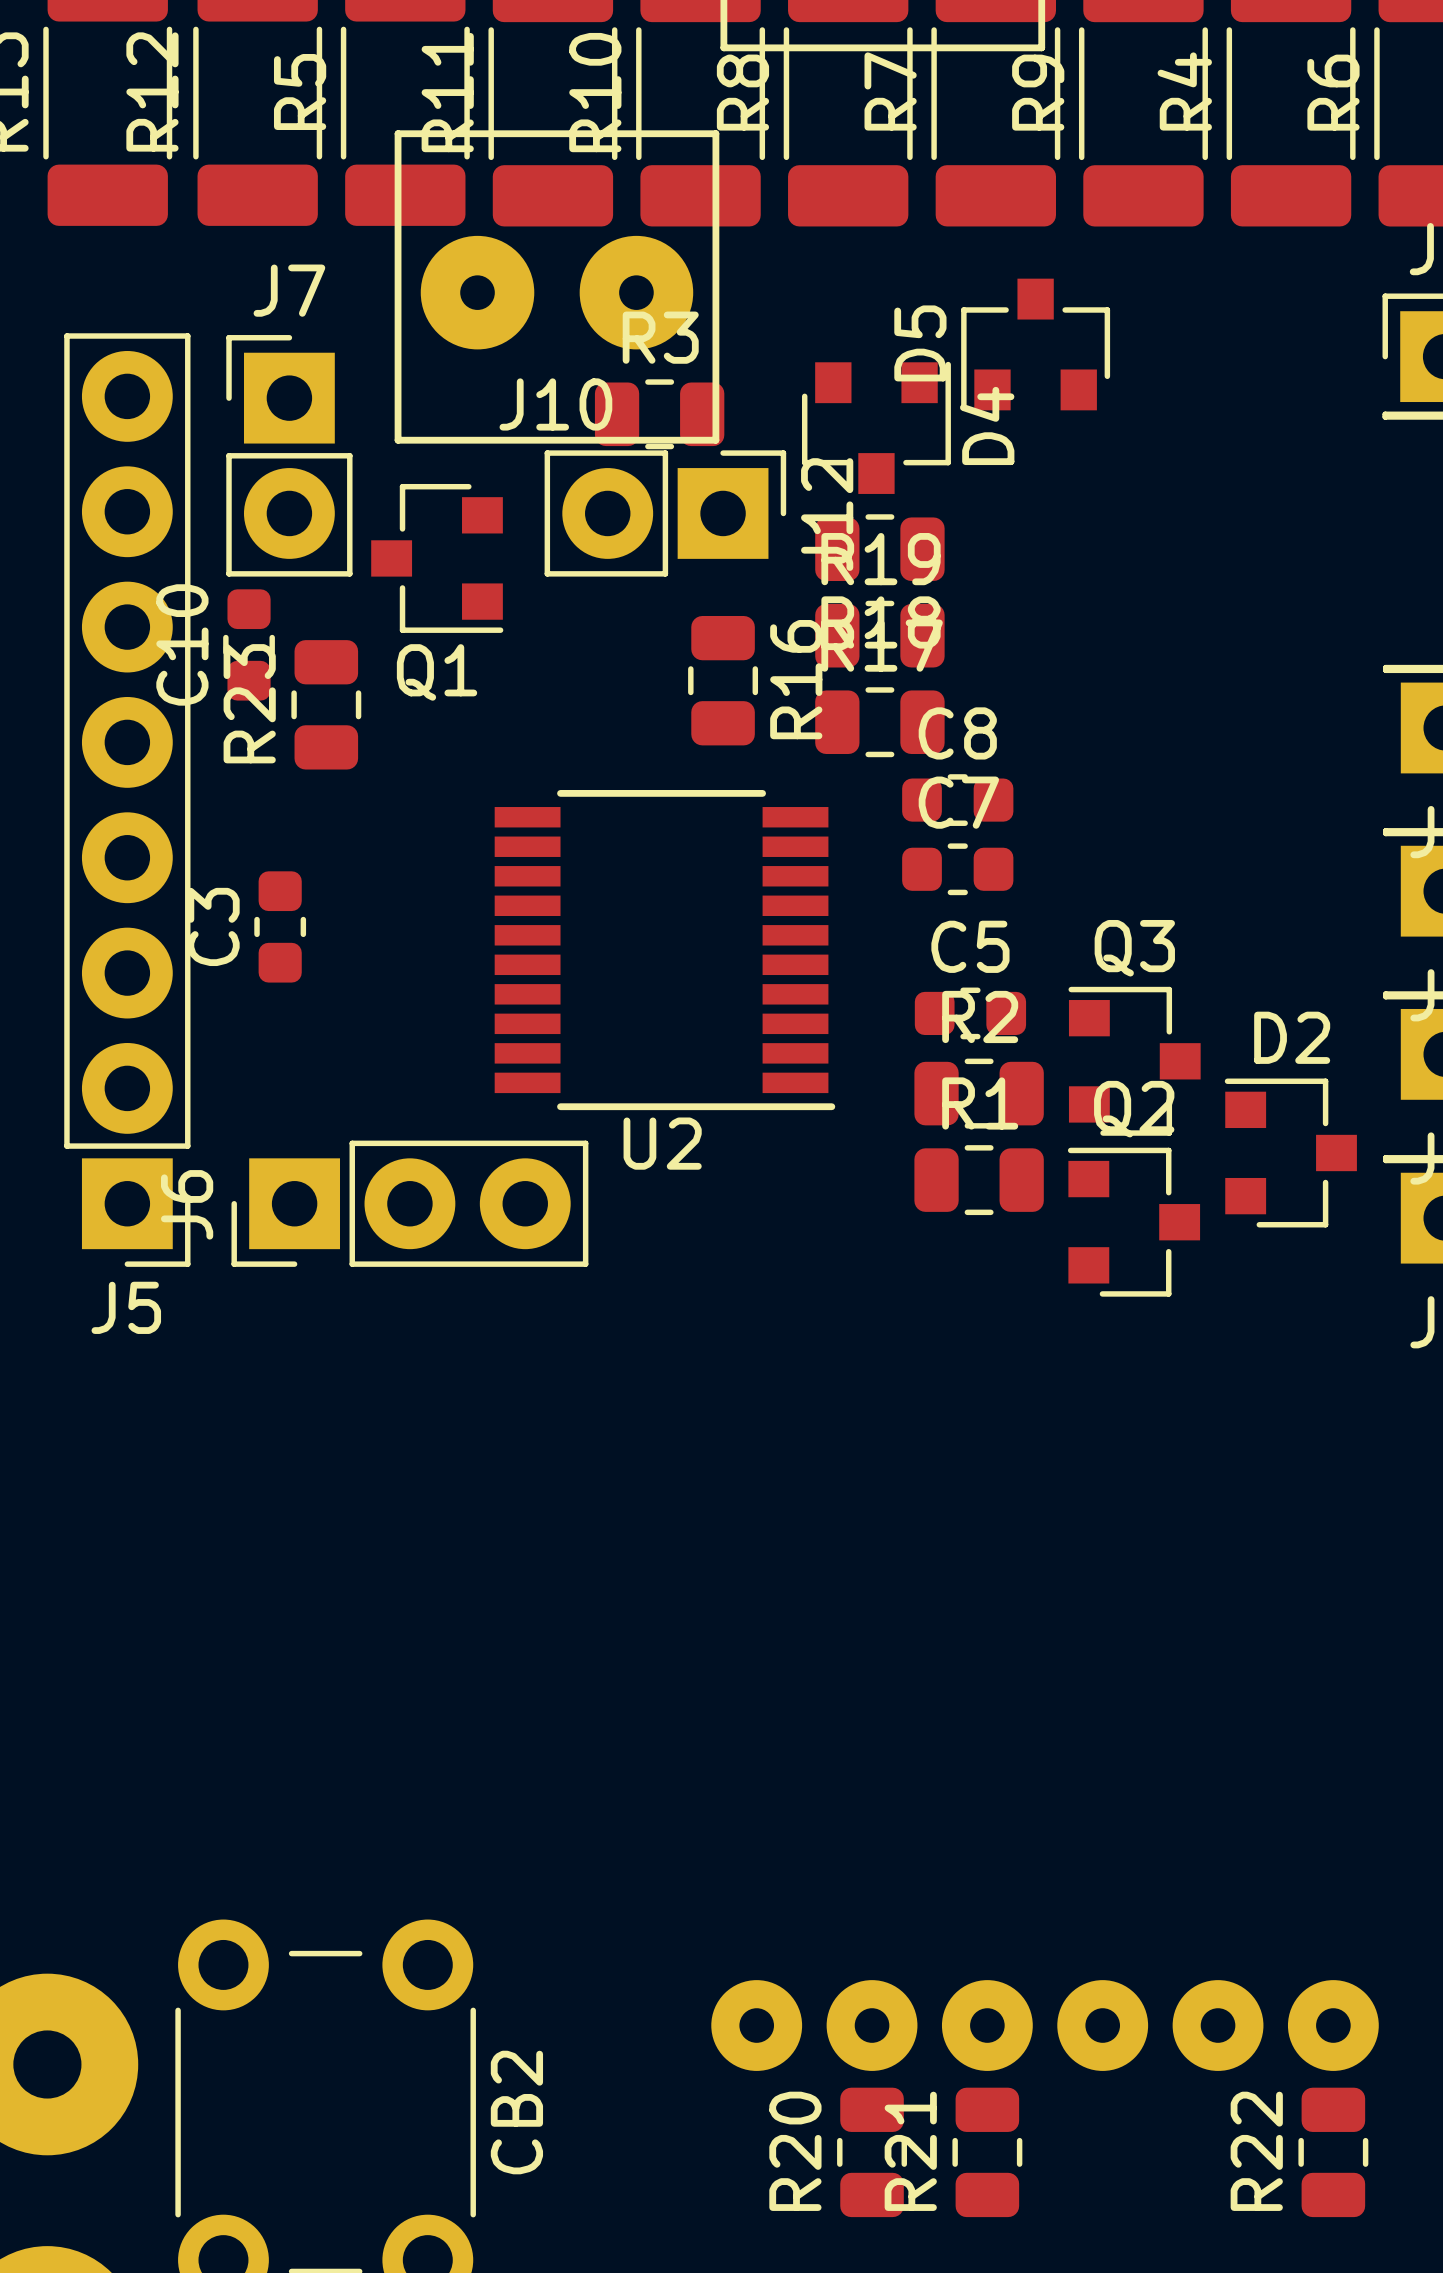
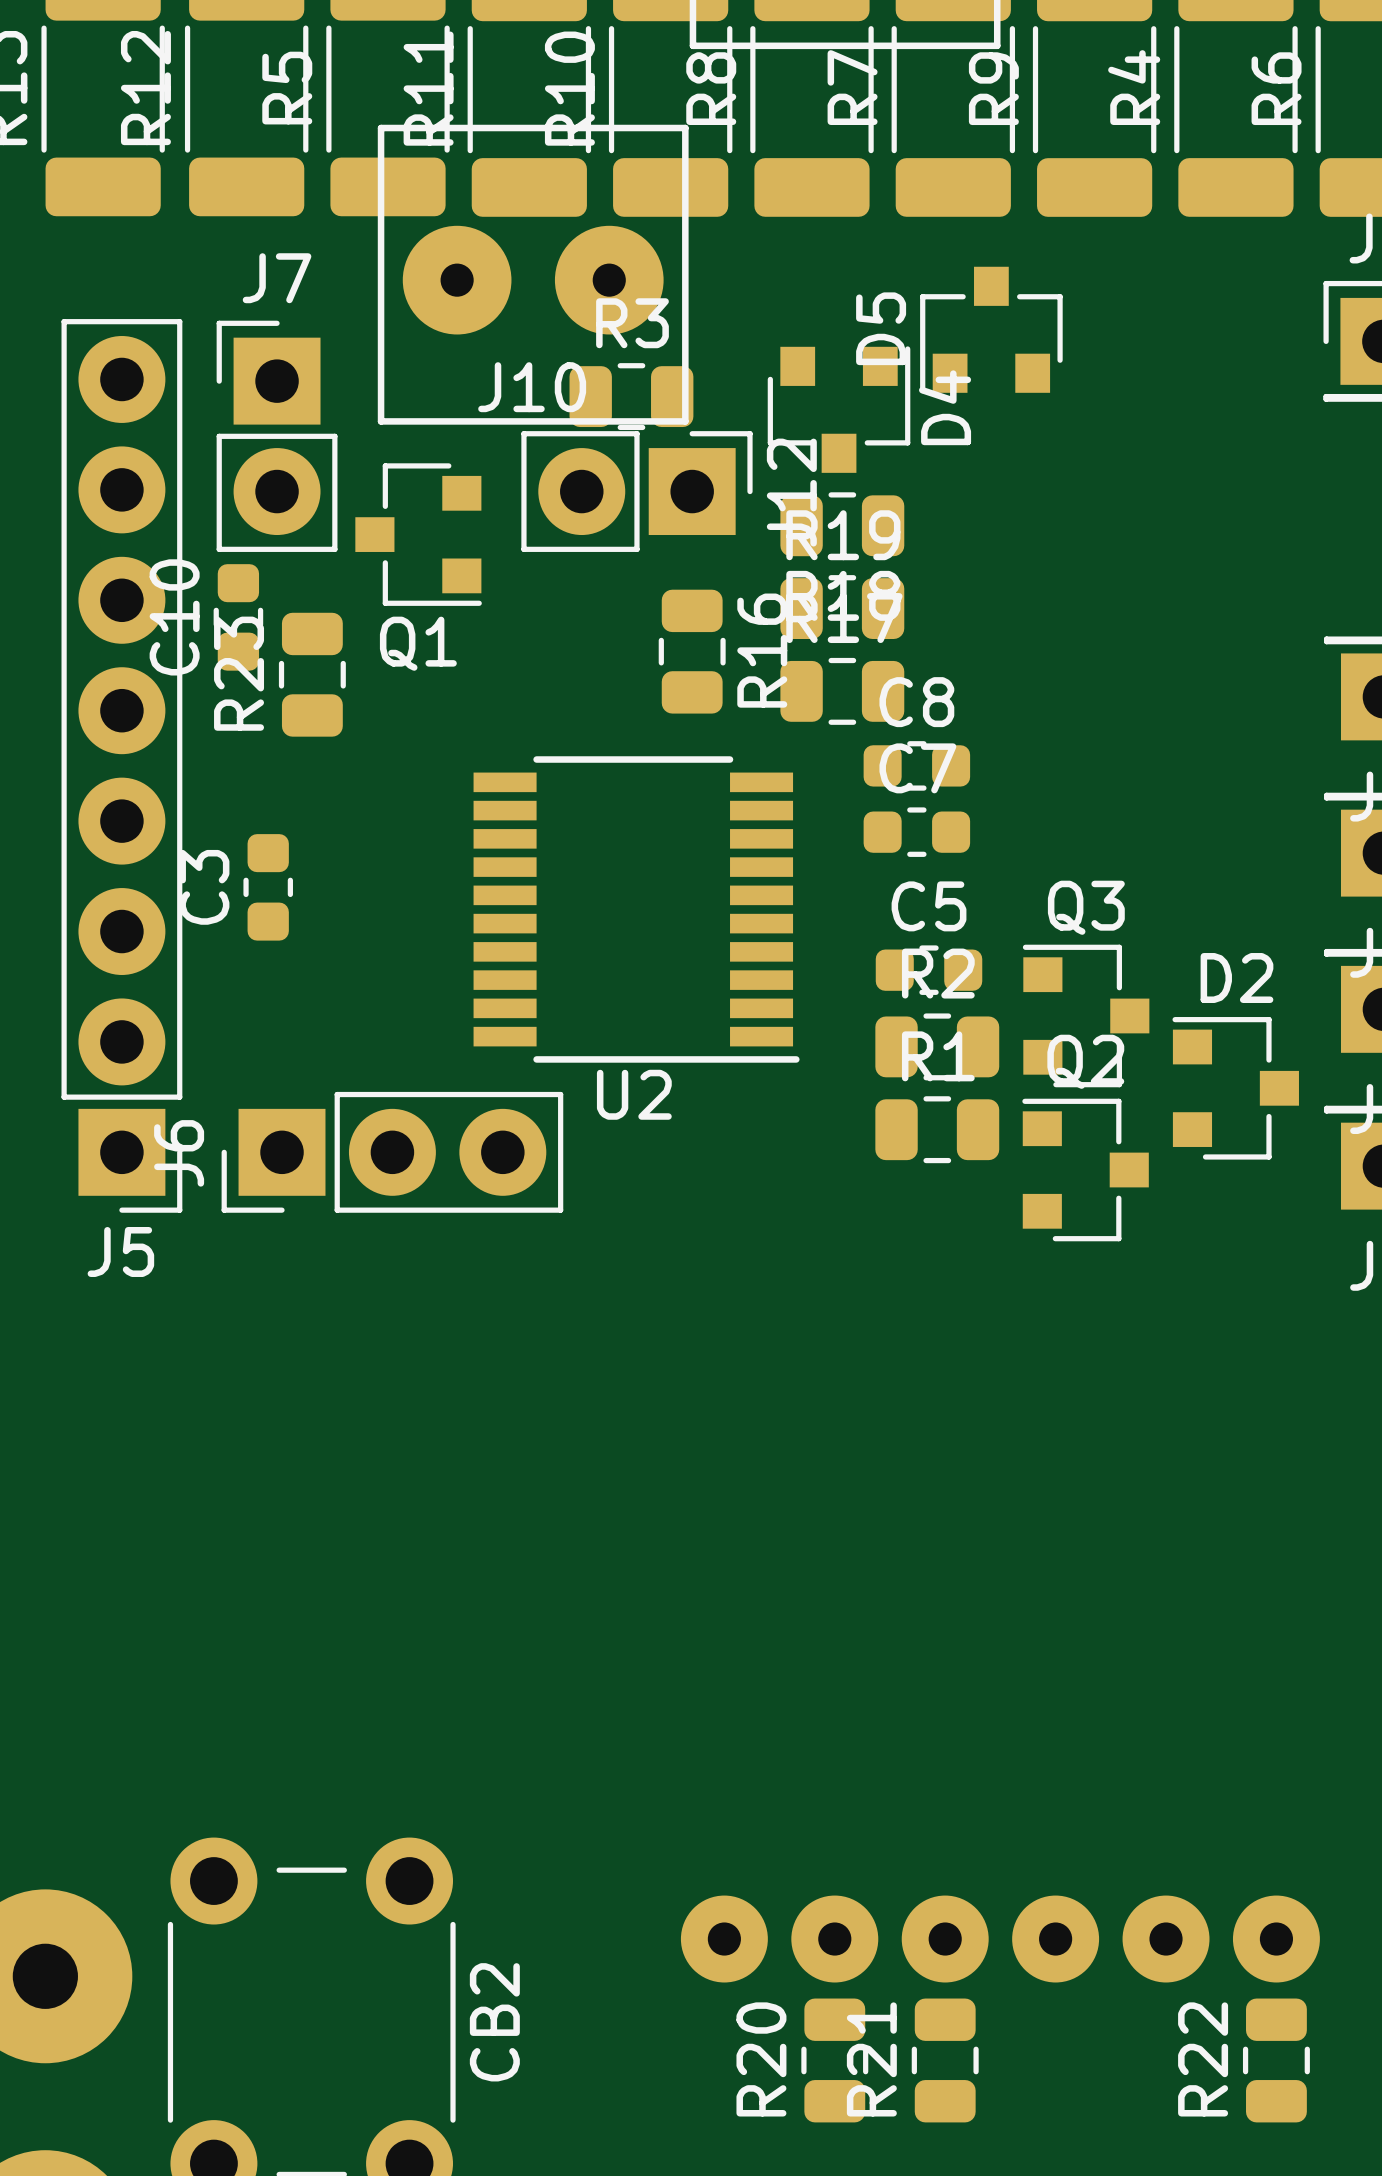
D2 position: (1290, 1152) -> (1235, 1088)

